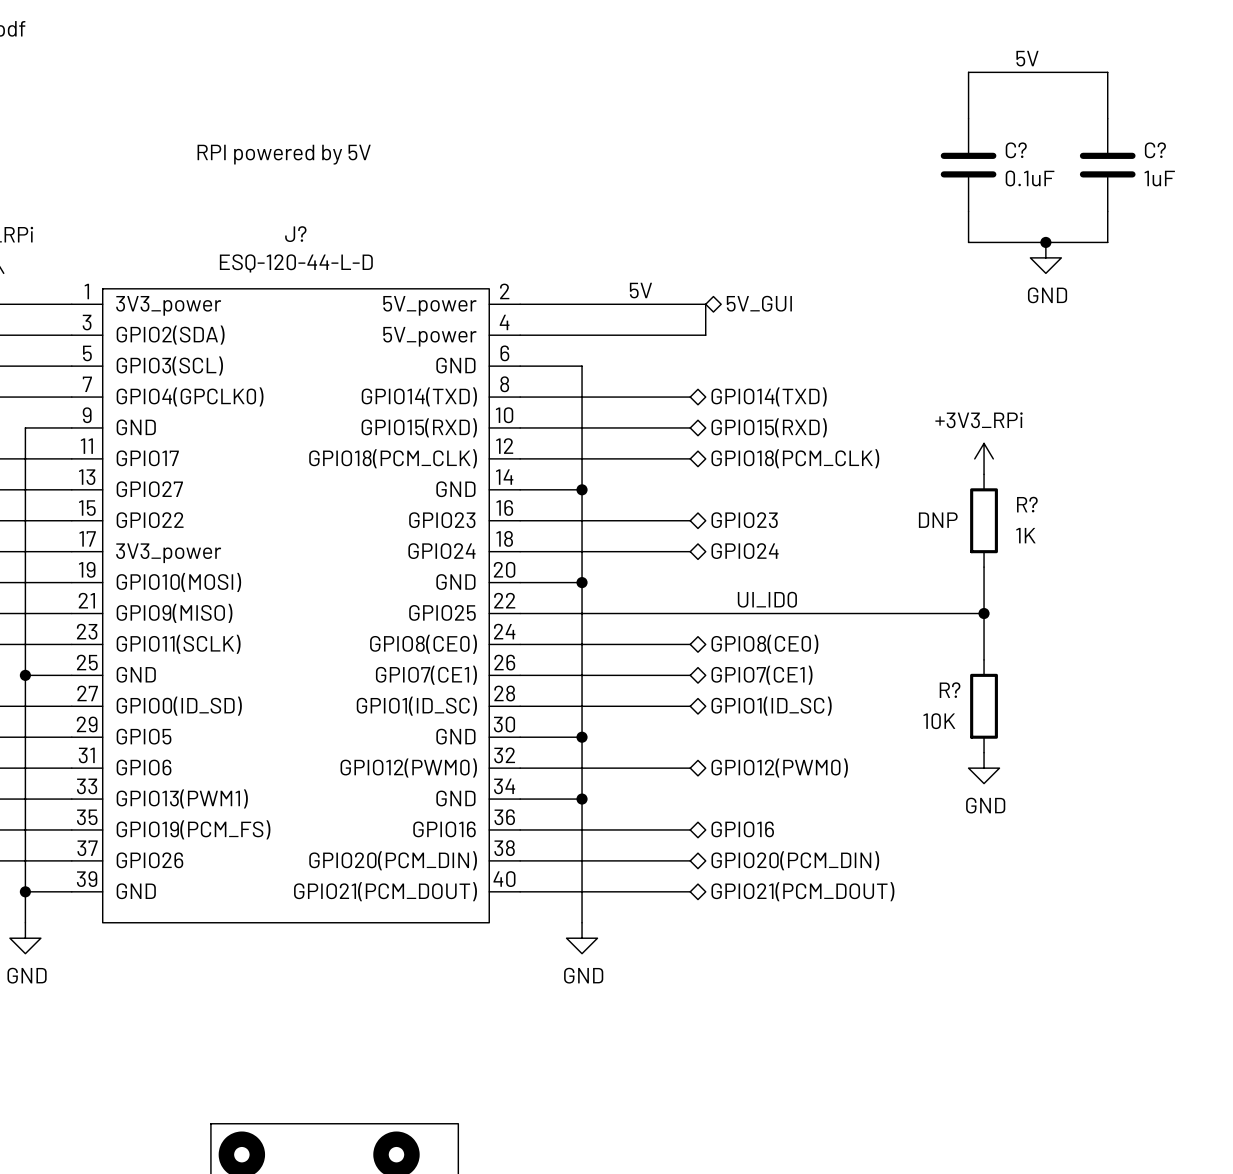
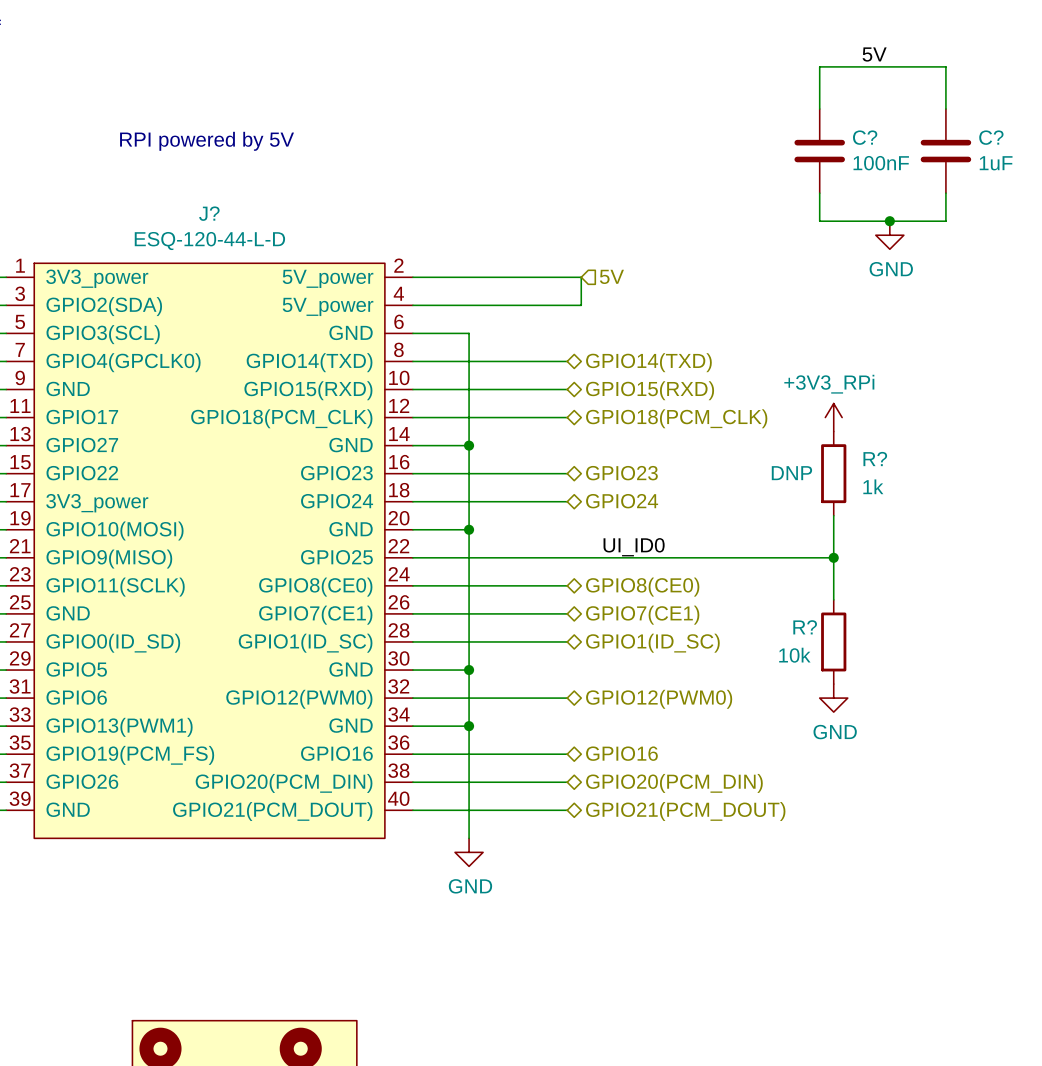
C? value: 0.1uF (1030, 178) -> 100nF (881, 163)
label: 5V (640, 290) -> none
hierarchical label shape: bidirectional (759, 303) -> input (611, 276)
hierarchical label: 5V_GUI (759, 303) -> 5V (611, 276)
R? value: 1K (1025, 535) -> 1k (873, 486)
R? value: 10K (939, 721) -> 10k (794, 655)

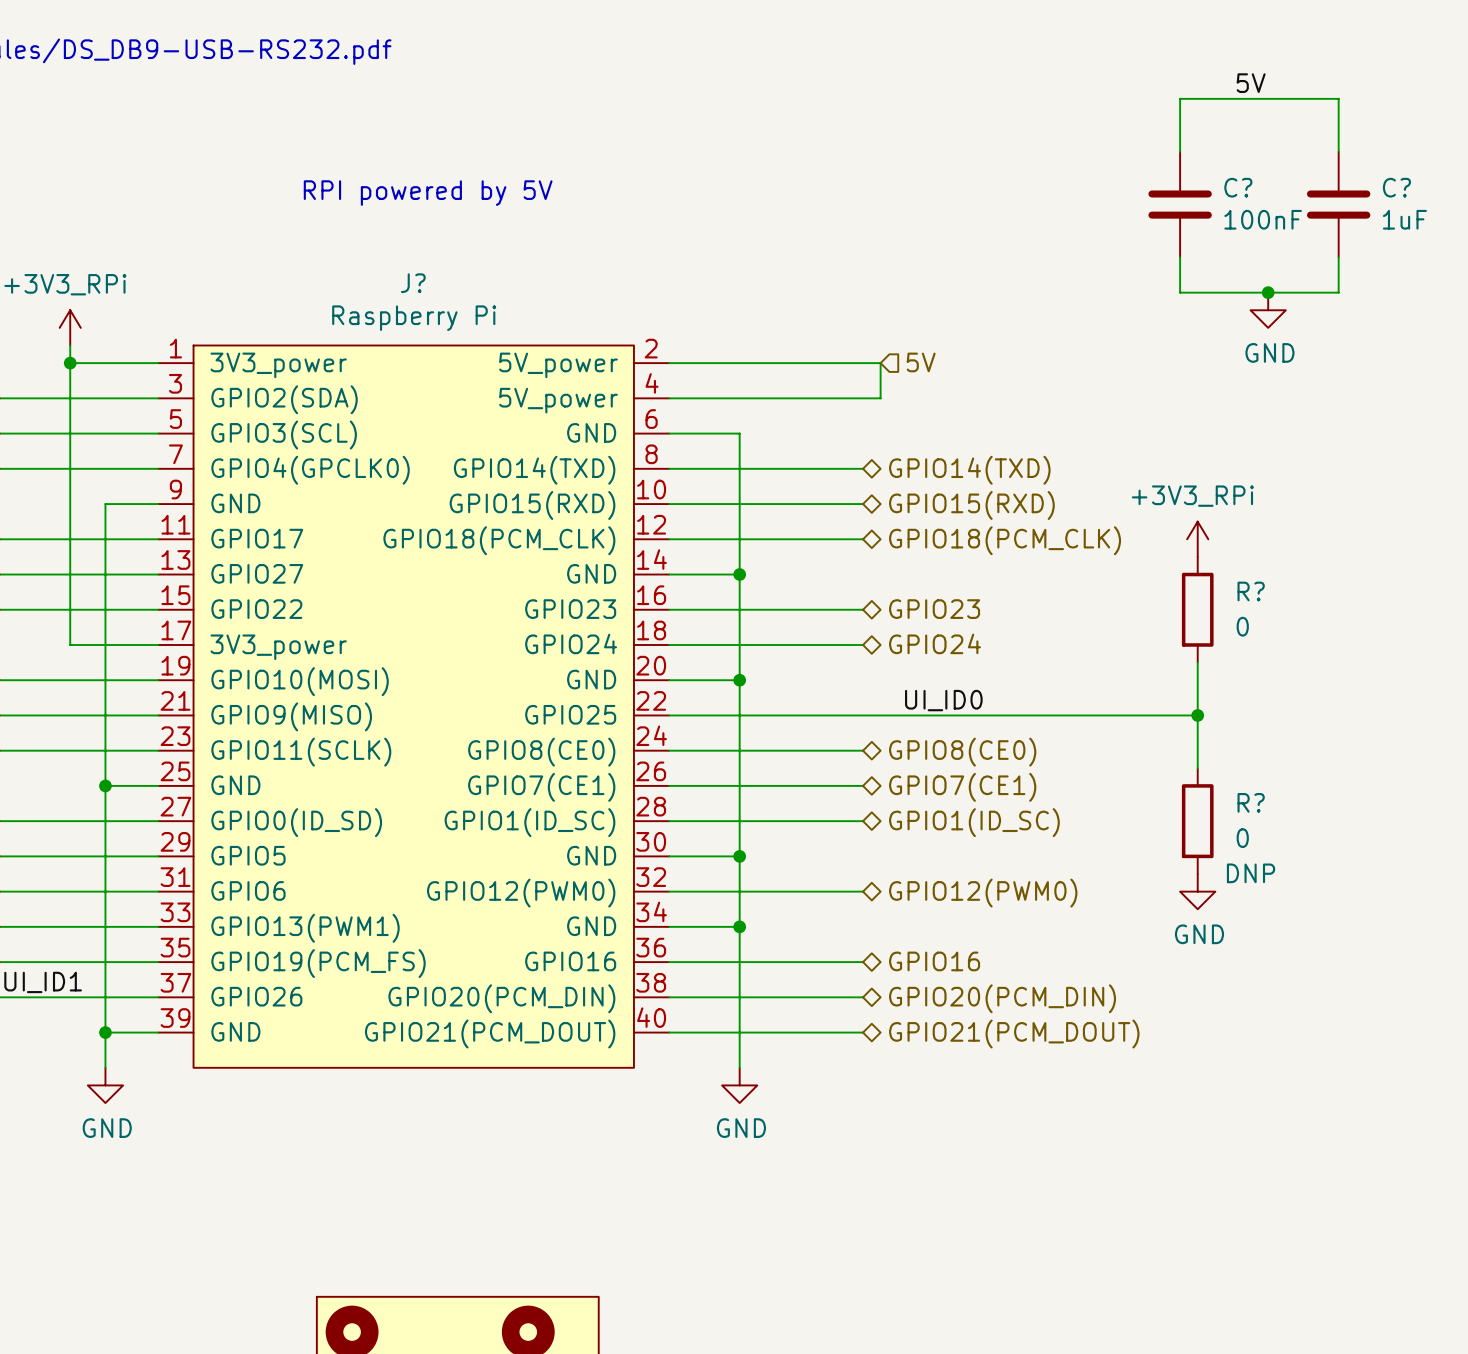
J? value: ESQ-120-44-L-D (209, 241) -> Raspberry Pi (414, 318)
R? text: DNP (791, 473) -> none
R? value: 1k (873, 486) -> 0 (1242, 626)
R? name position: R? (805, 627) -> R? (1251, 802)
R? value: 10k (794, 655) -> 0 (1242, 838)
R? text: none -> DNP (1251, 873)

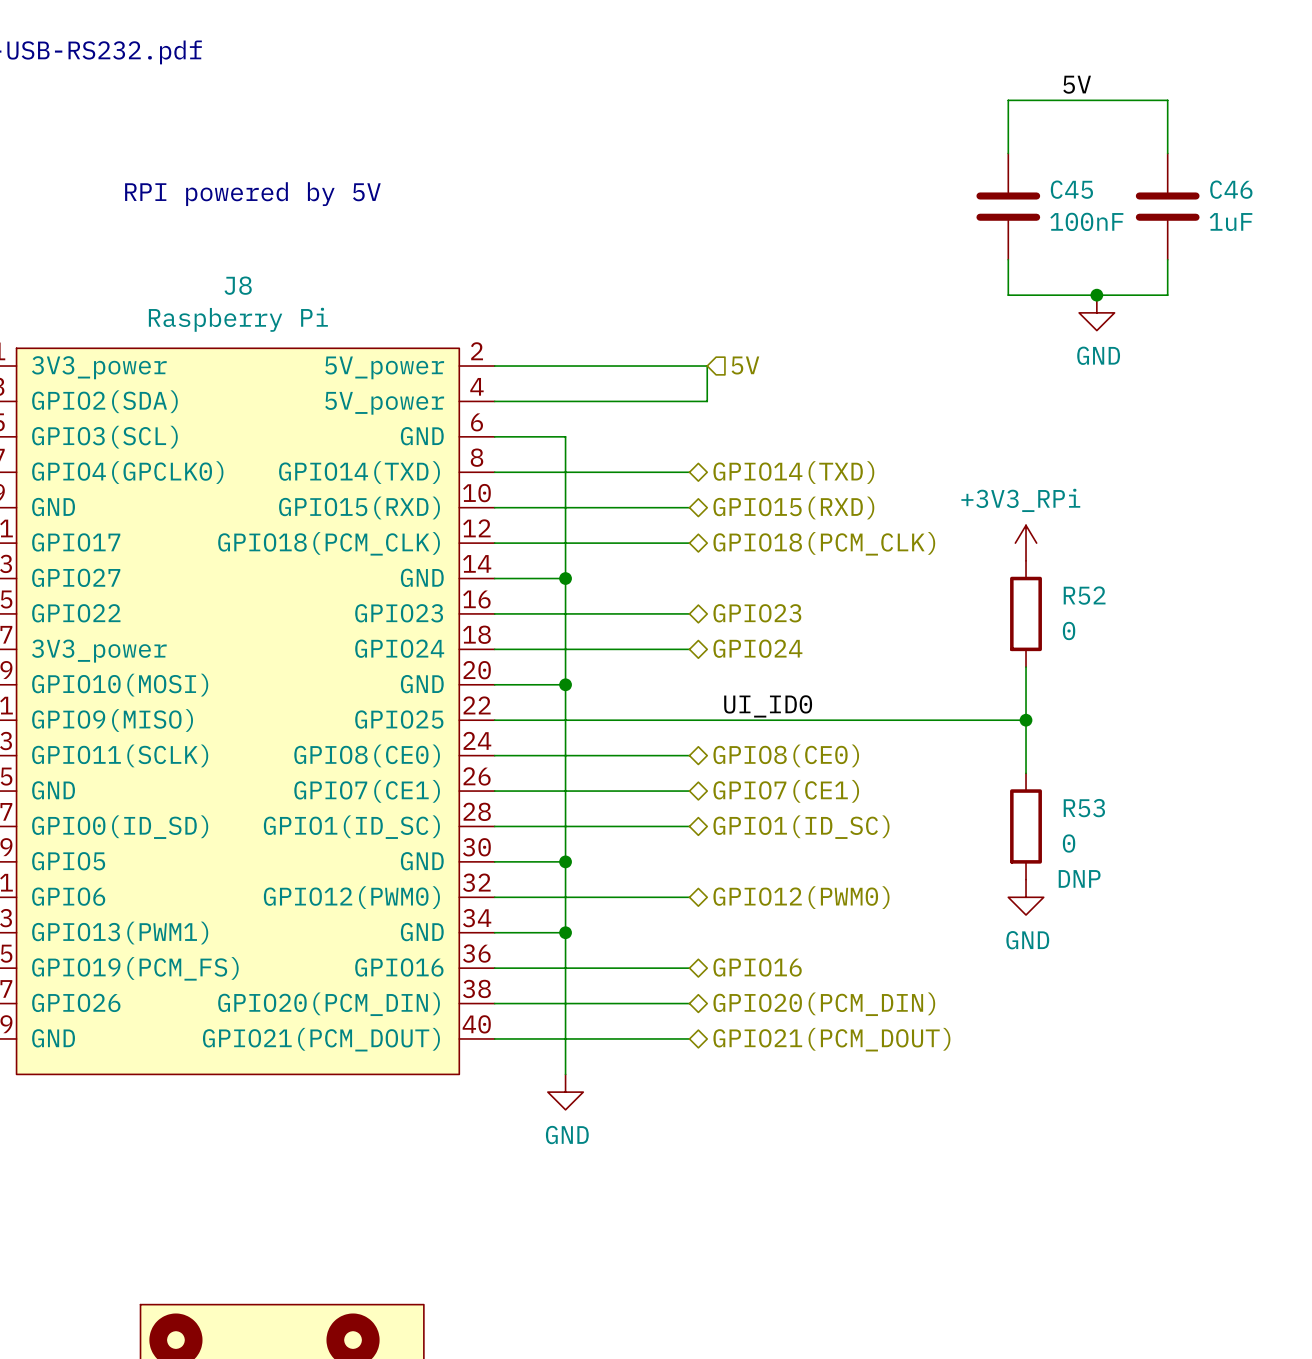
C? name: C? (1238, 187) -> C45 (1071, 189)
C? name: C? (1396, 187) -> C46 (1231, 189)
J? name: J? (413, 283) -> J8 (238, 285)
R? name: R? (1251, 591) -> R52 (1084, 595)
R? name: R? (1251, 802) -> R53 (1084, 808)

